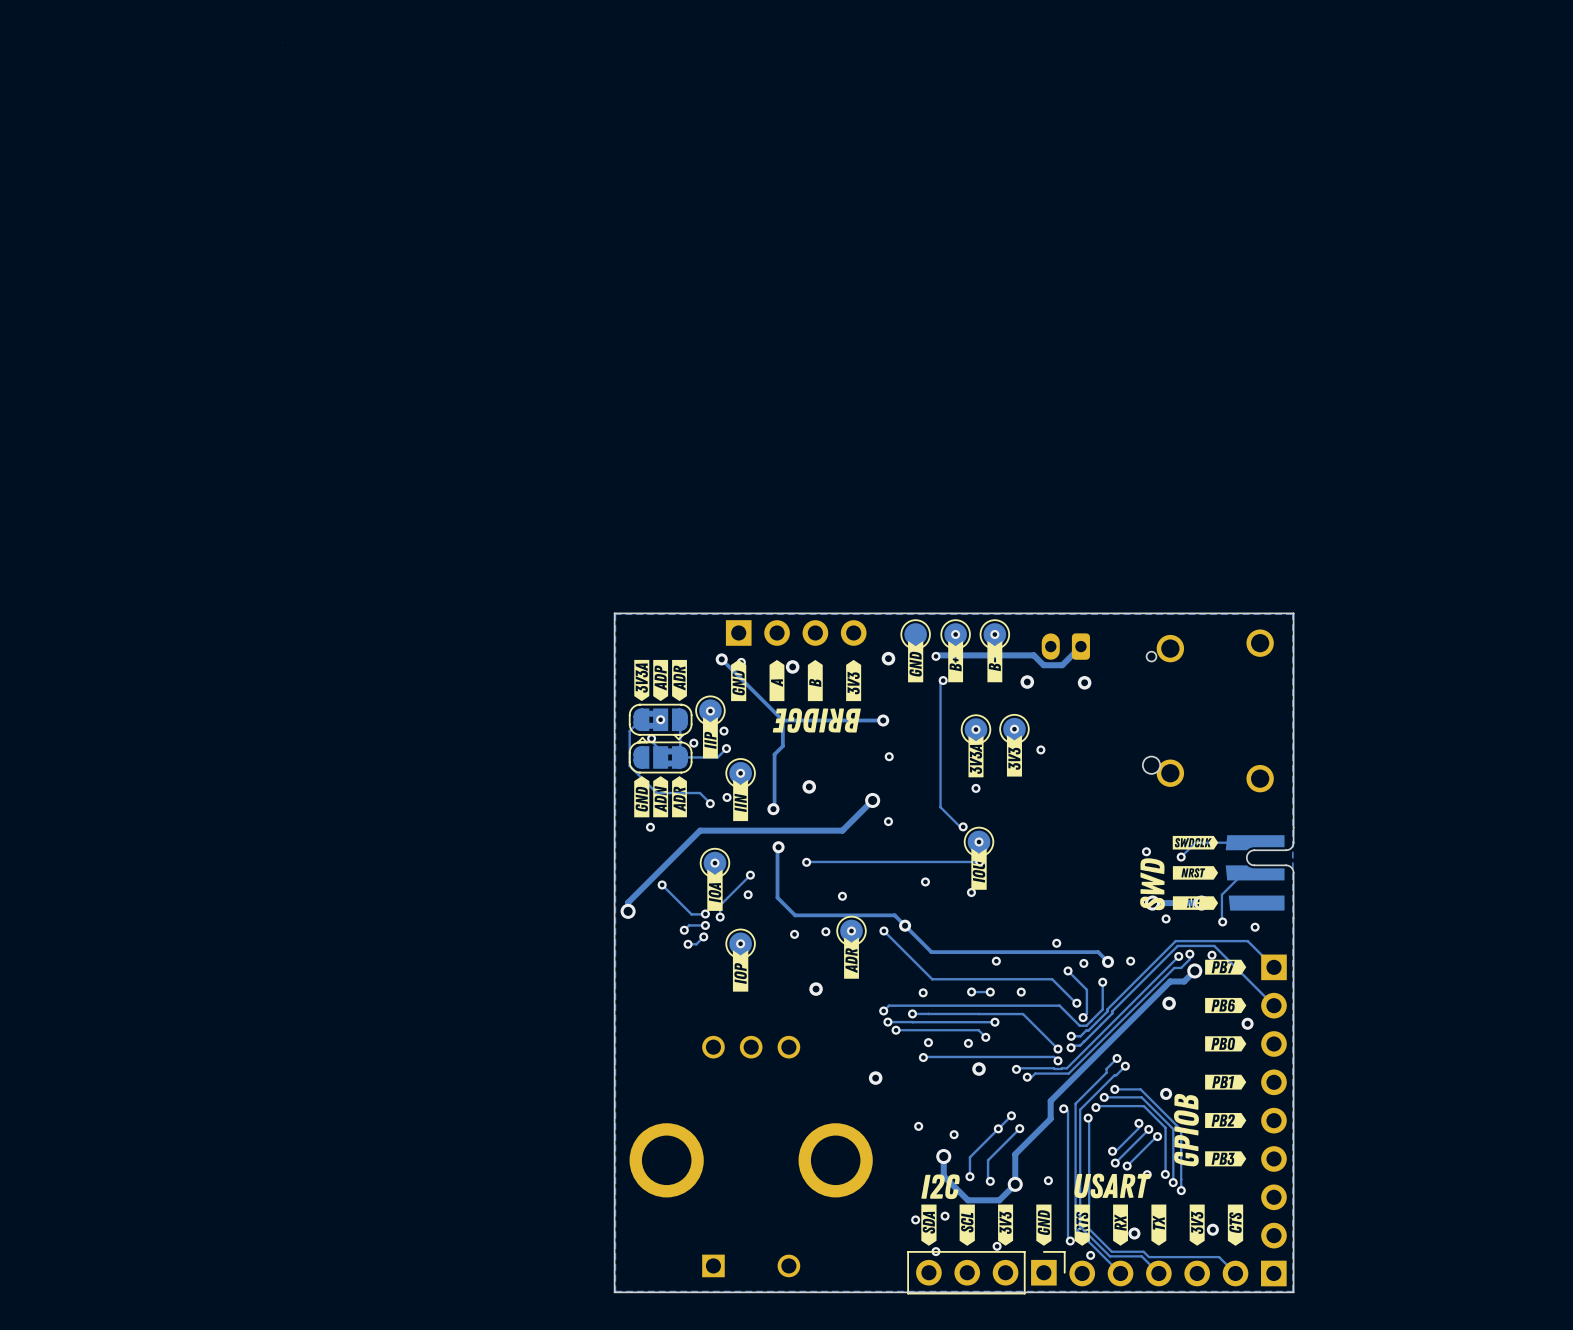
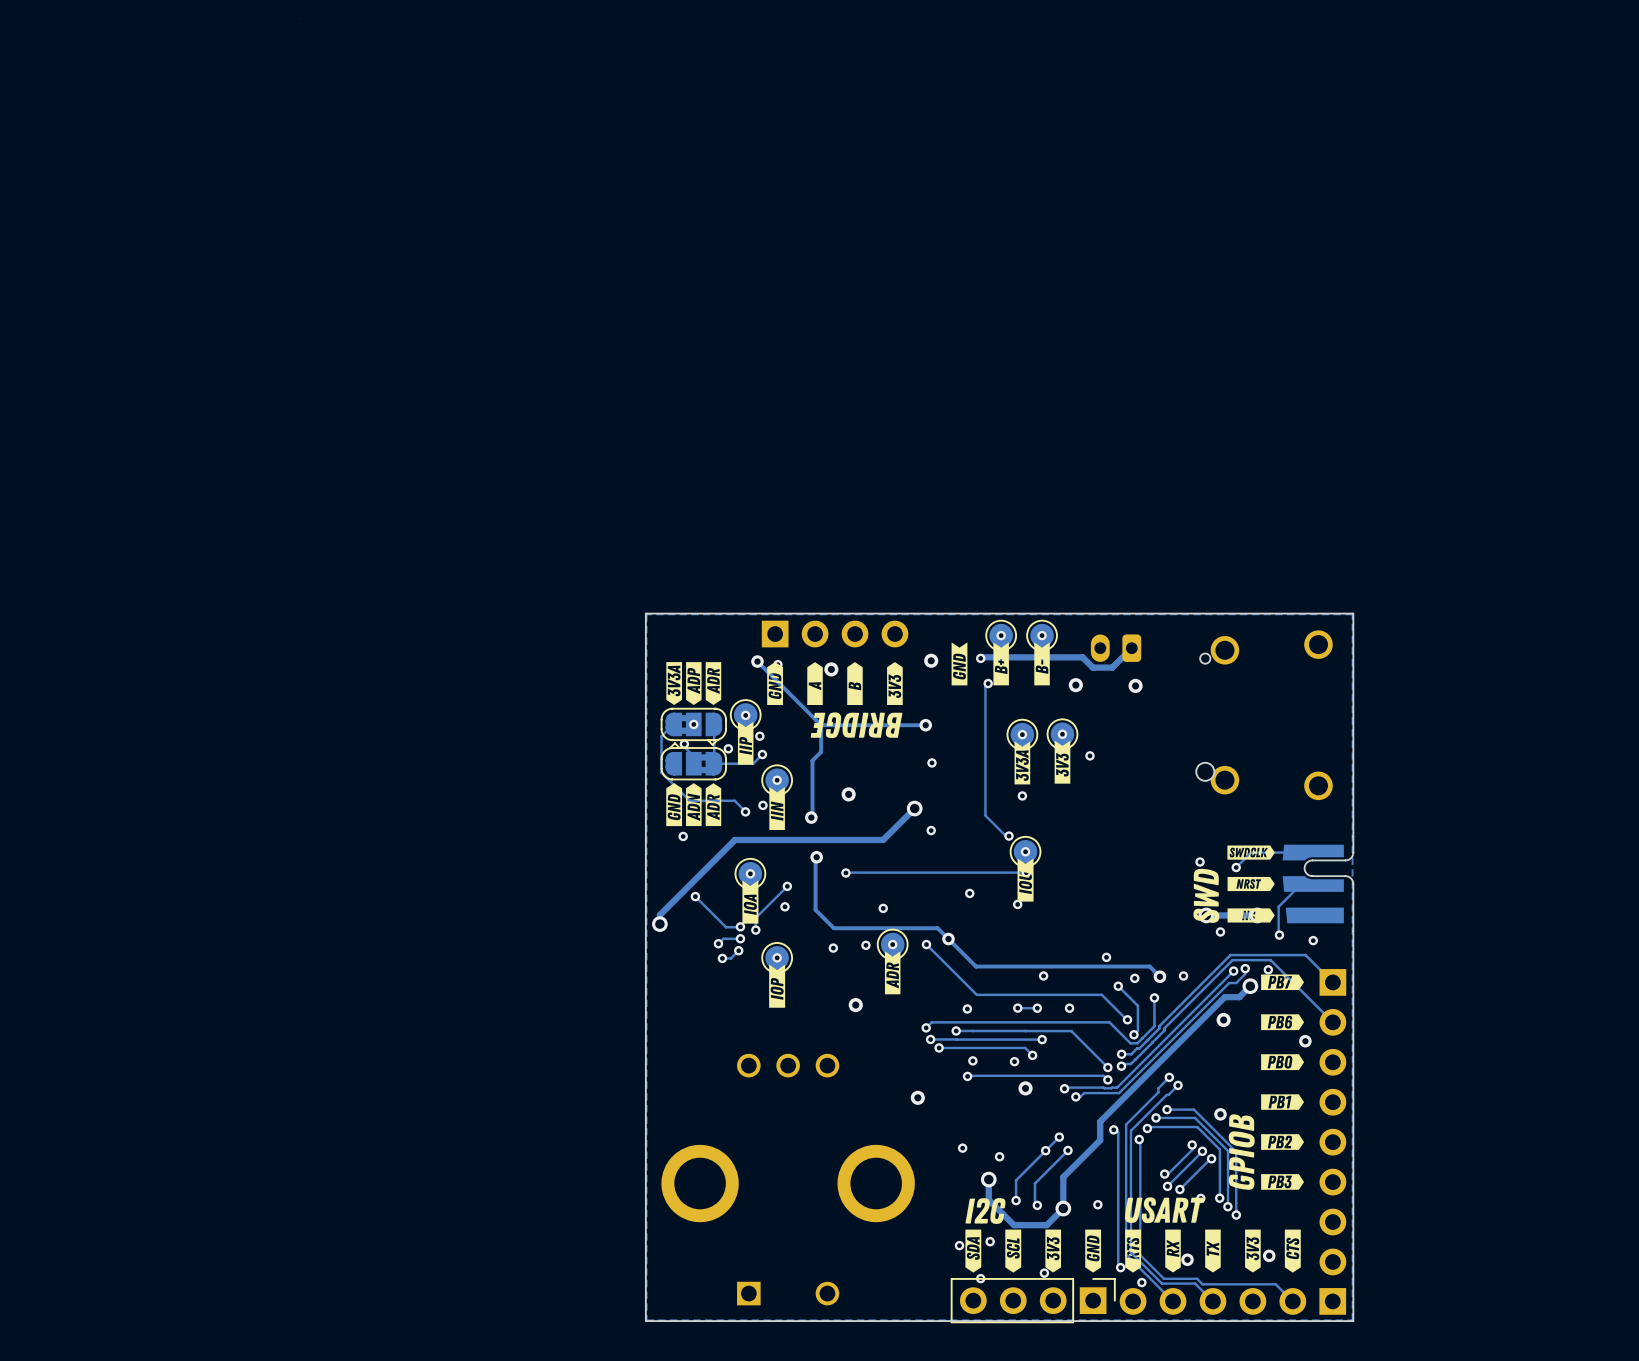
part: (915, 634) -> none

